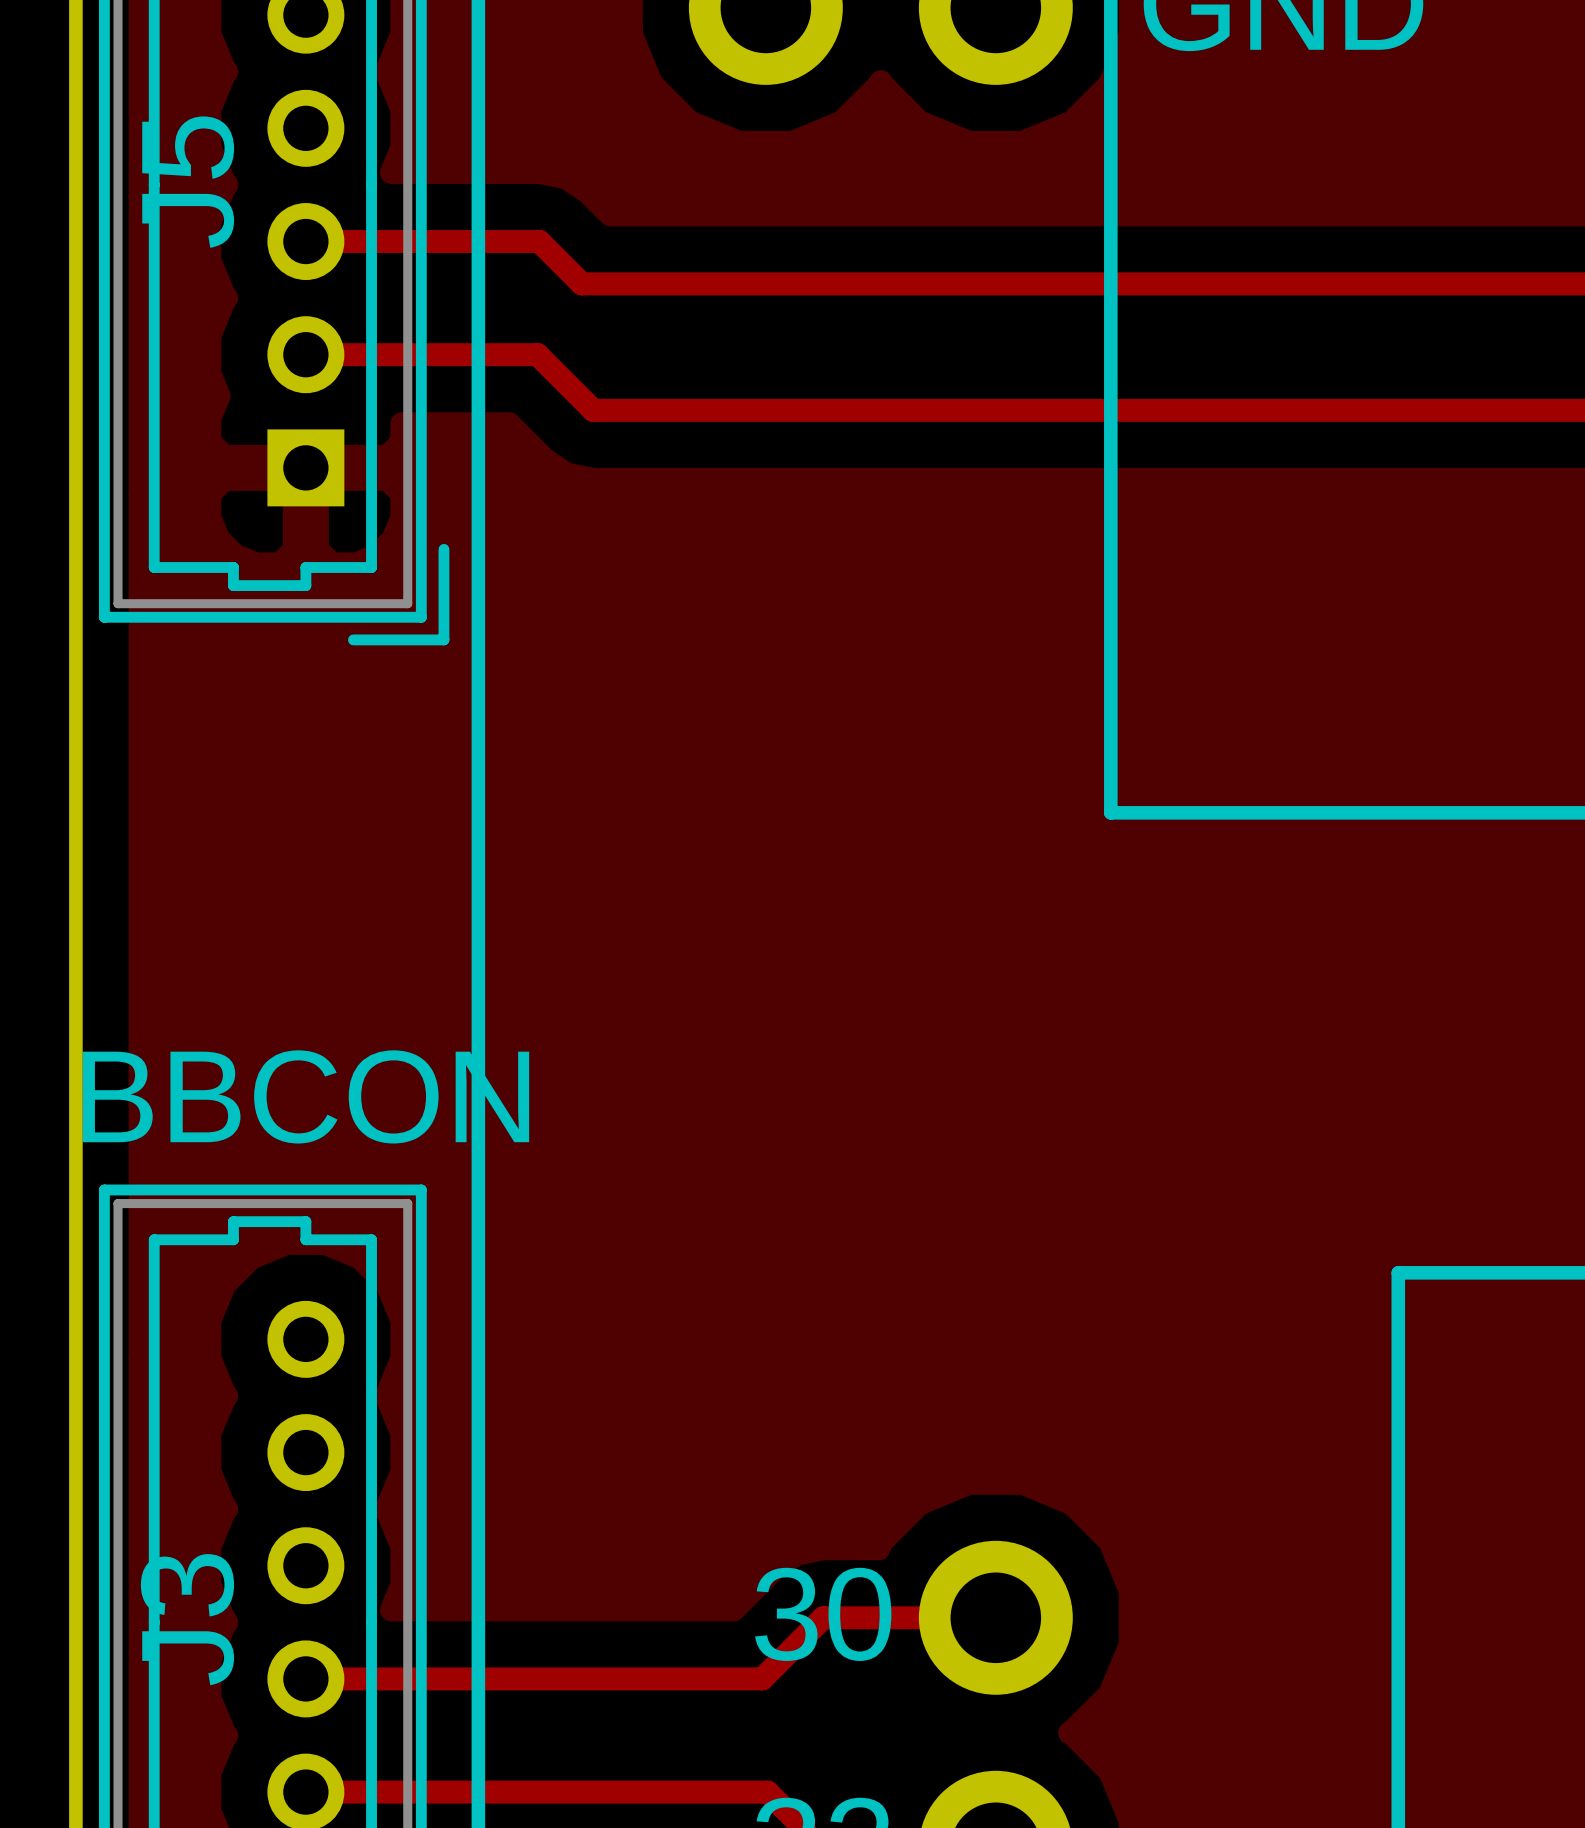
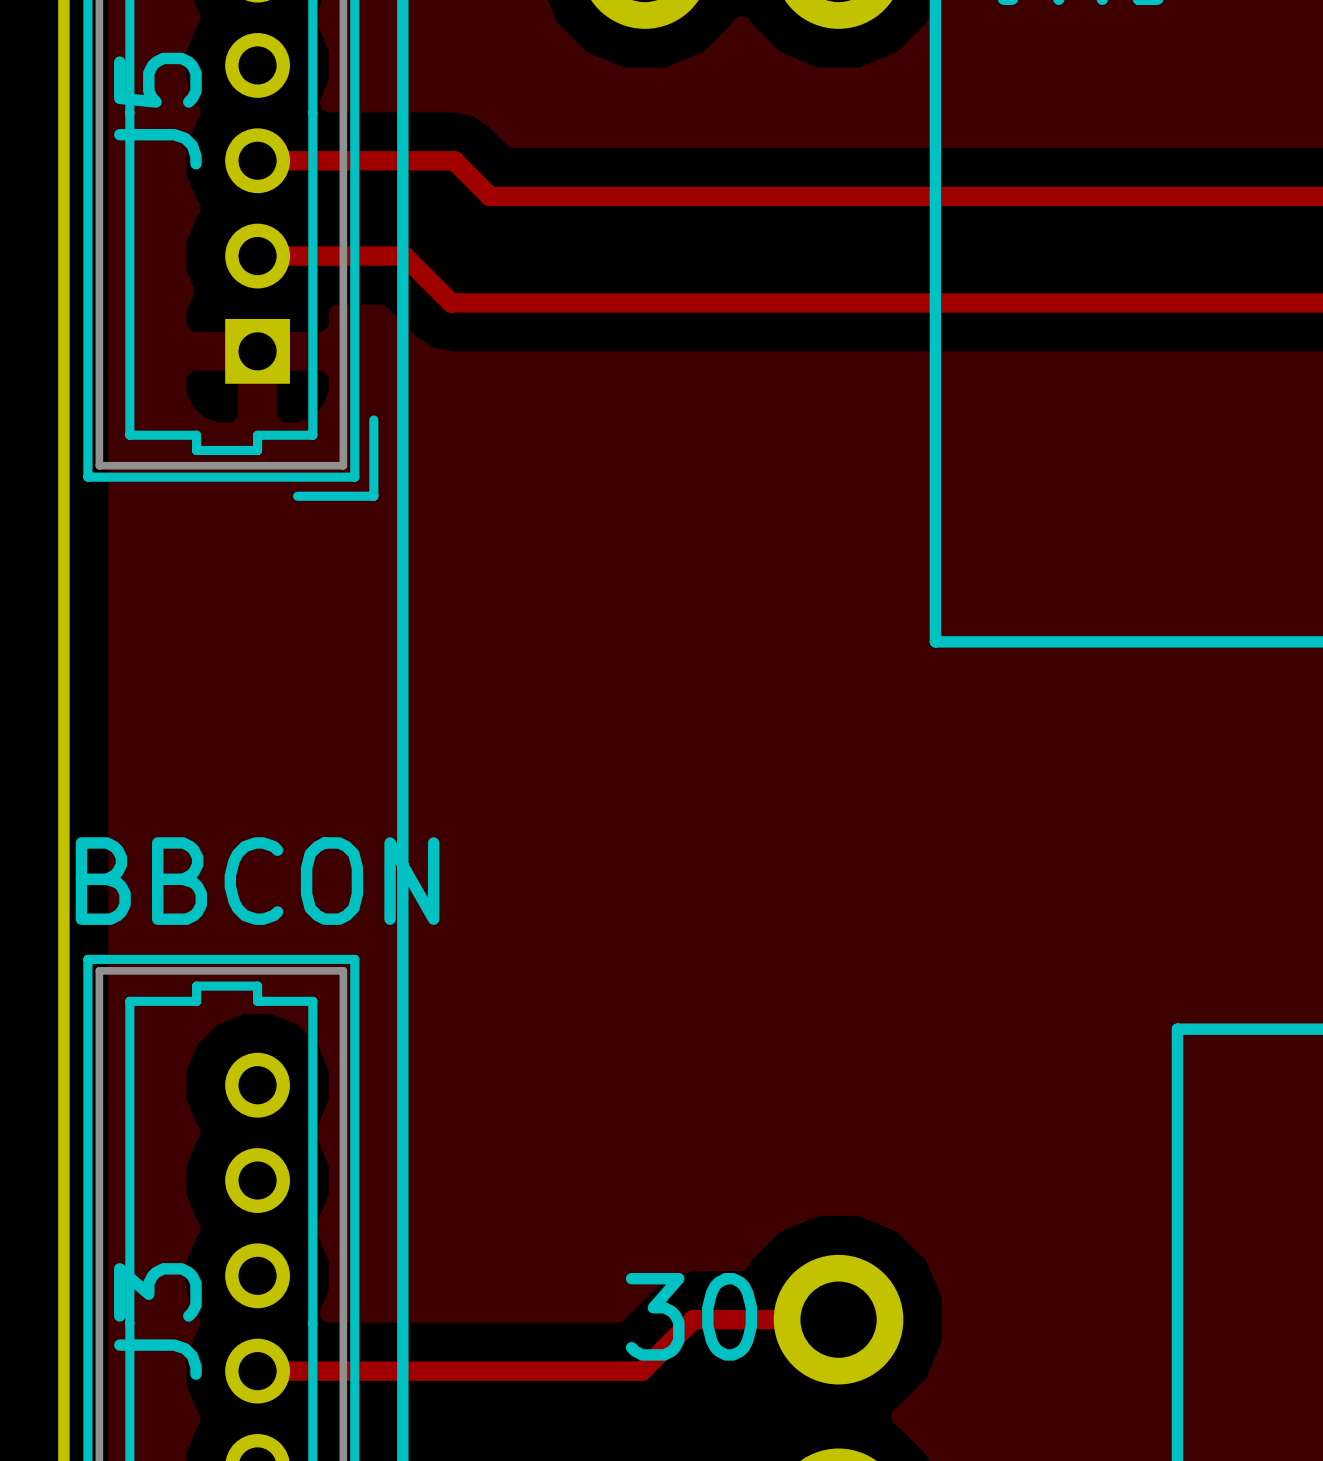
track: (480, 354) (537, 354) (593, 410) -> (404, 256) (451, 302) (499, 302)

